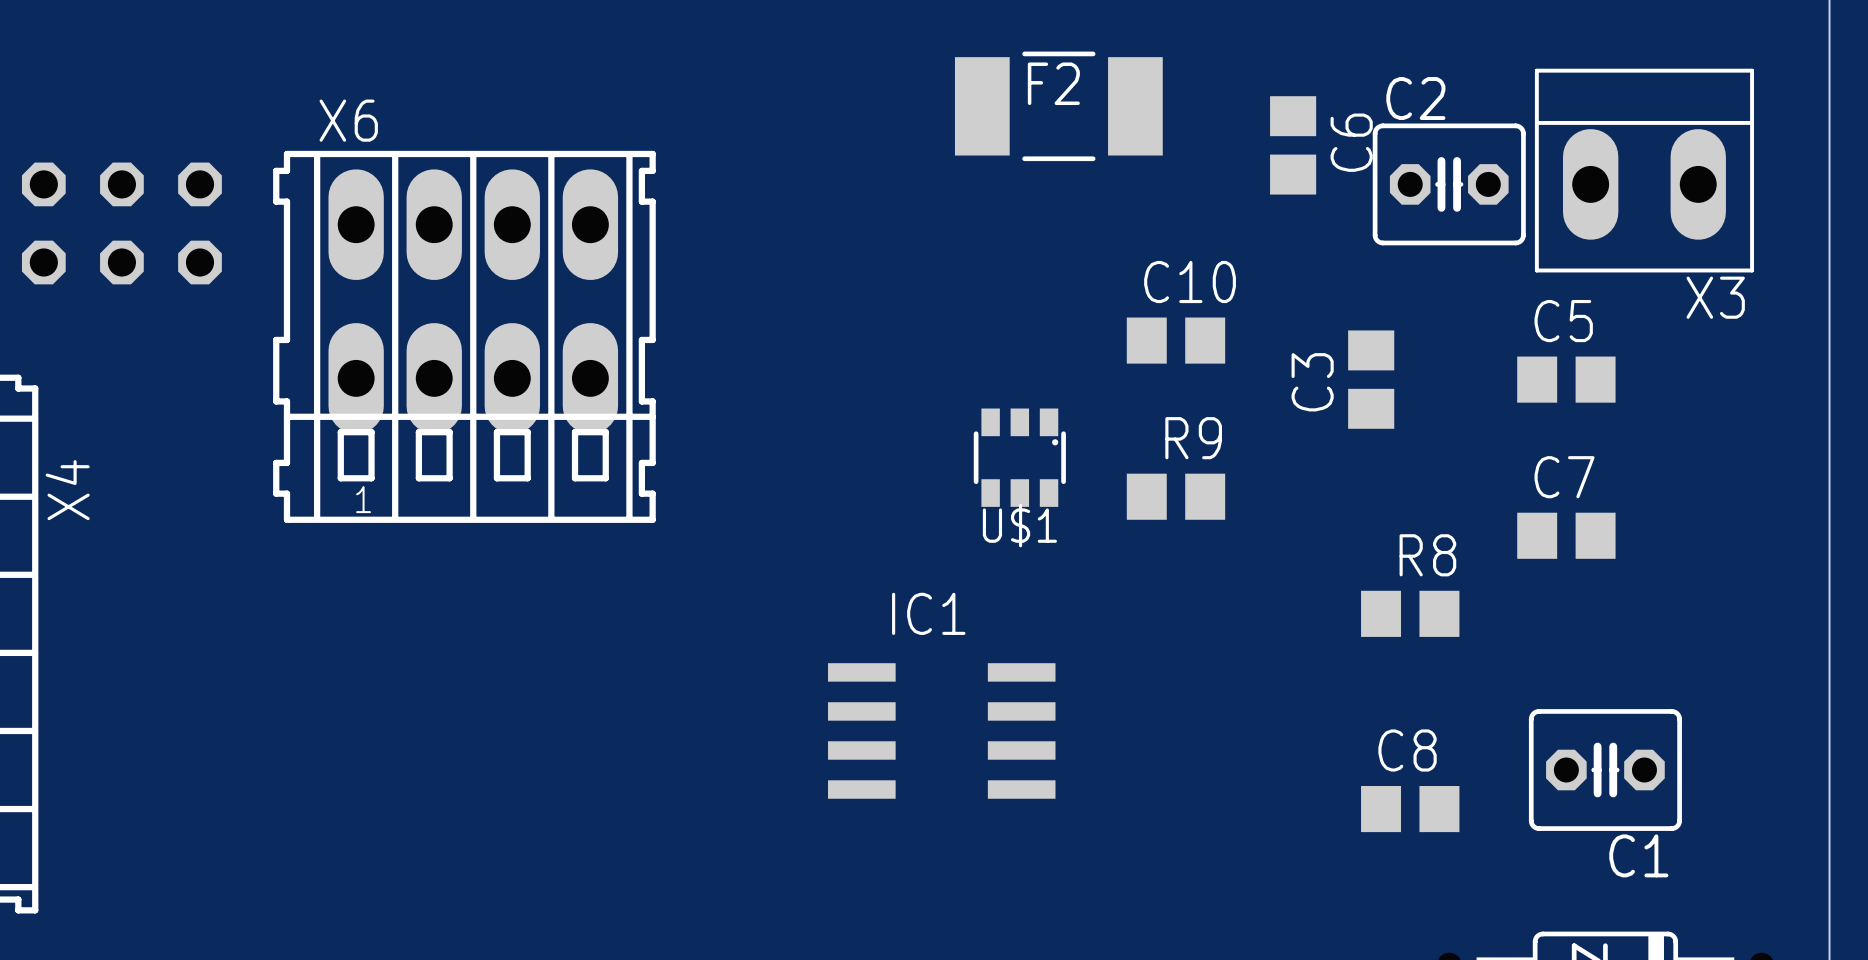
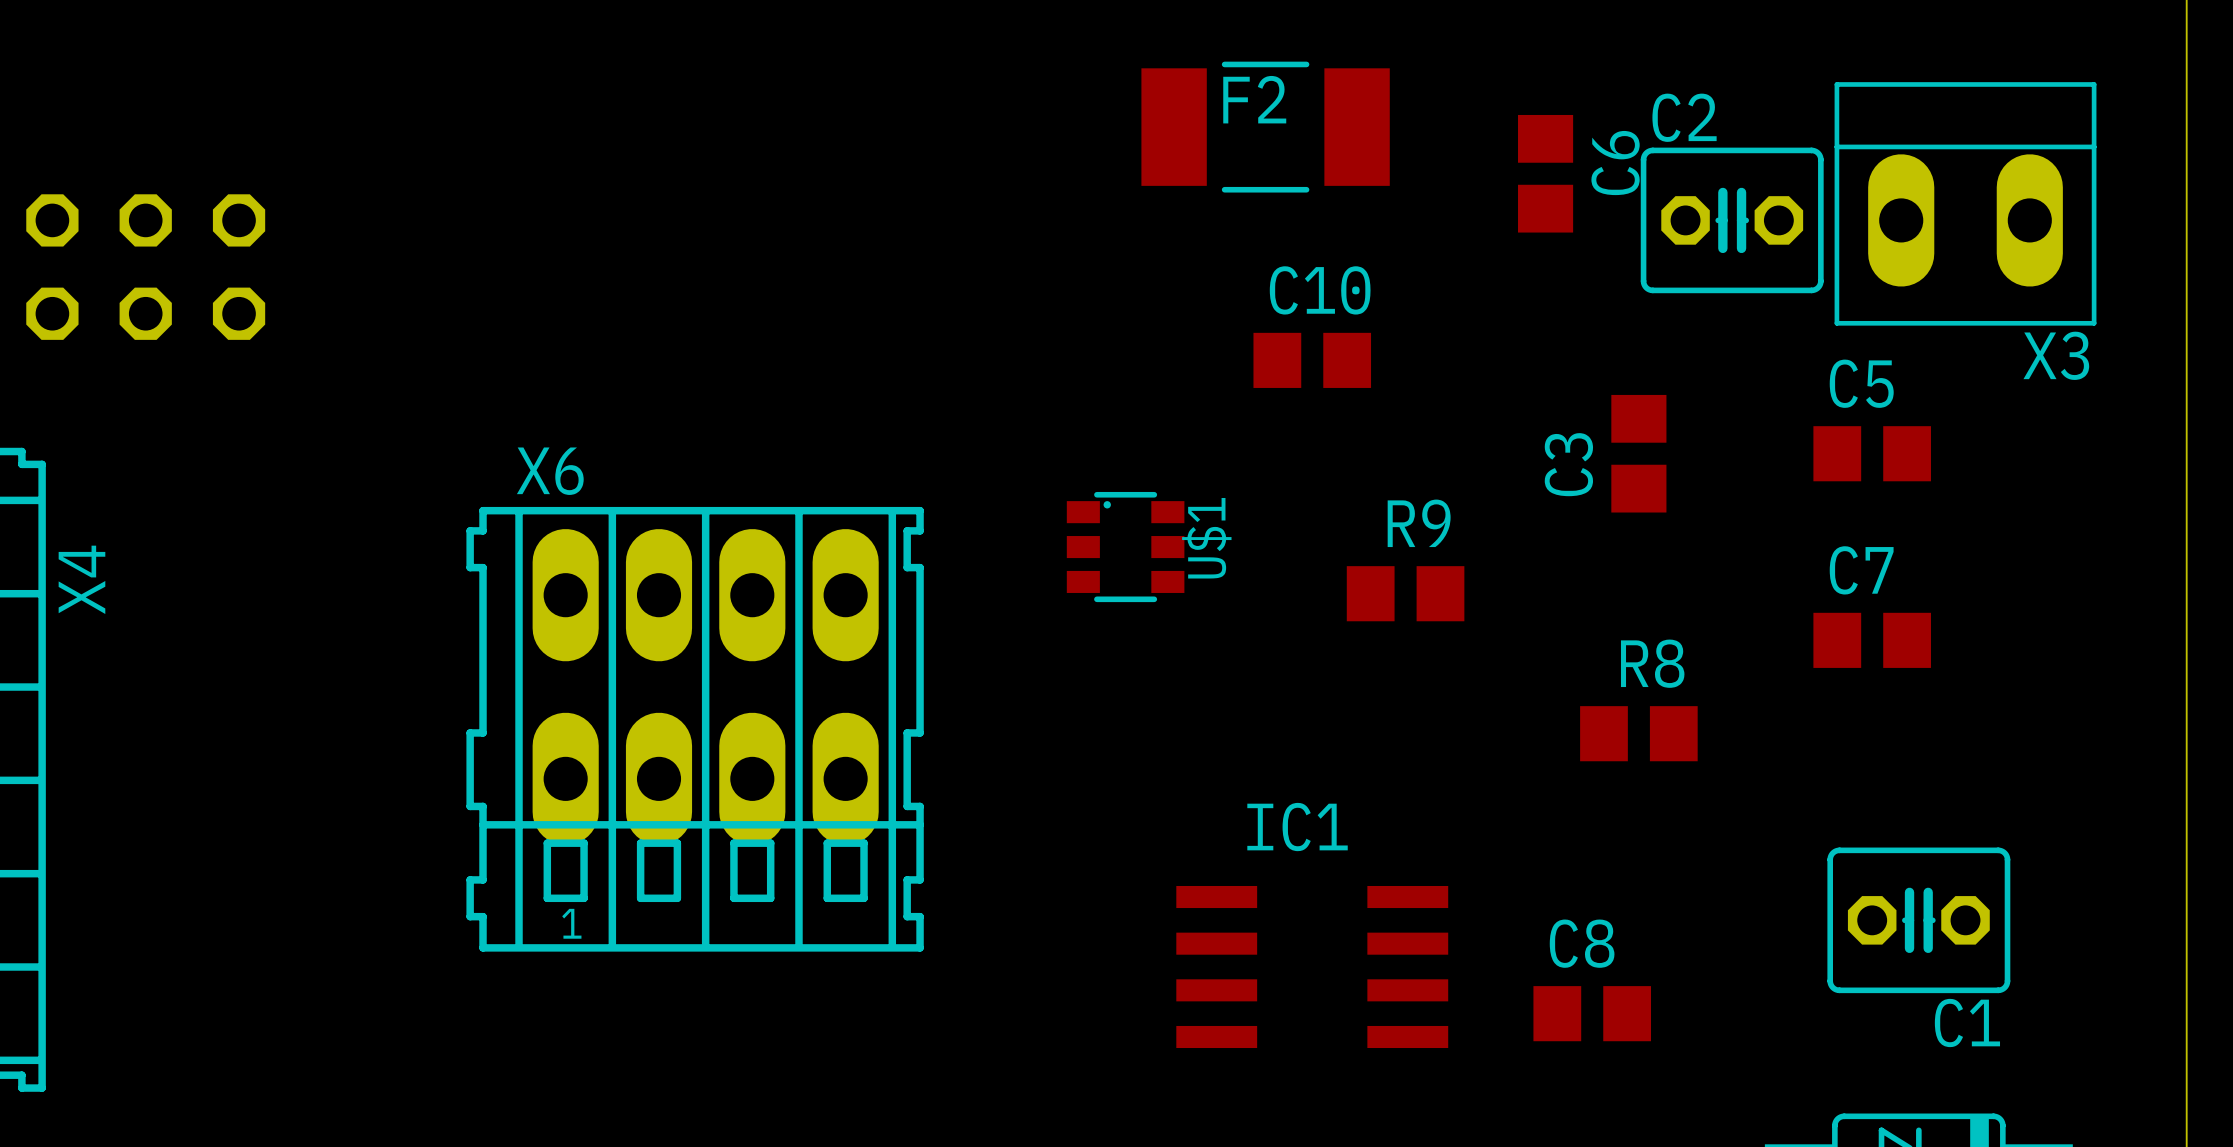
X6 position: (464, 336) -> (695, 729)
C10 position: (1175, 340) -> (1312, 360)
U$1 rotation: 0° (1019, 457) -> 90° counterclockwise (1125, 547)
U$1 position: (1019, 457) -> (1125, 547)
R8 position: (1410, 613) -> (1638, 733)
IC1 position: (941, 730) -> (1312, 967)
C8 position: (1410, 809) -> (1592, 1013)

